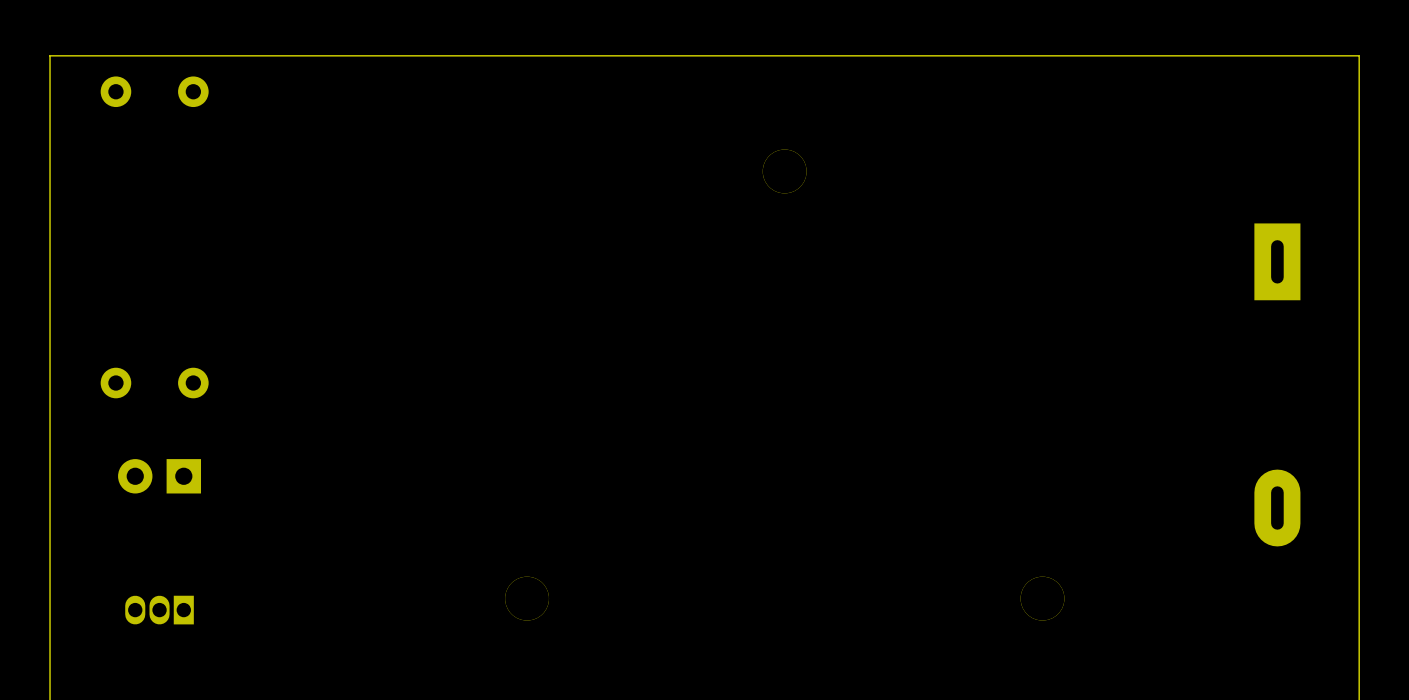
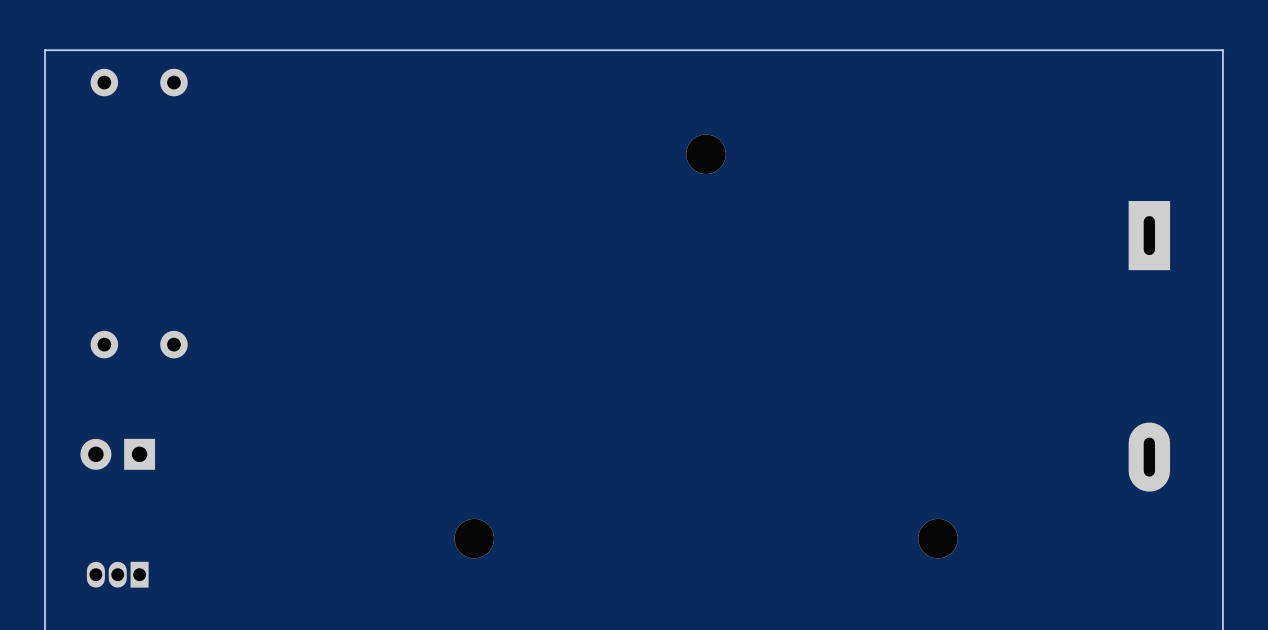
part position: (159, 476) -> (117, 454)
part position: (159, 610) -> (117, 574)

